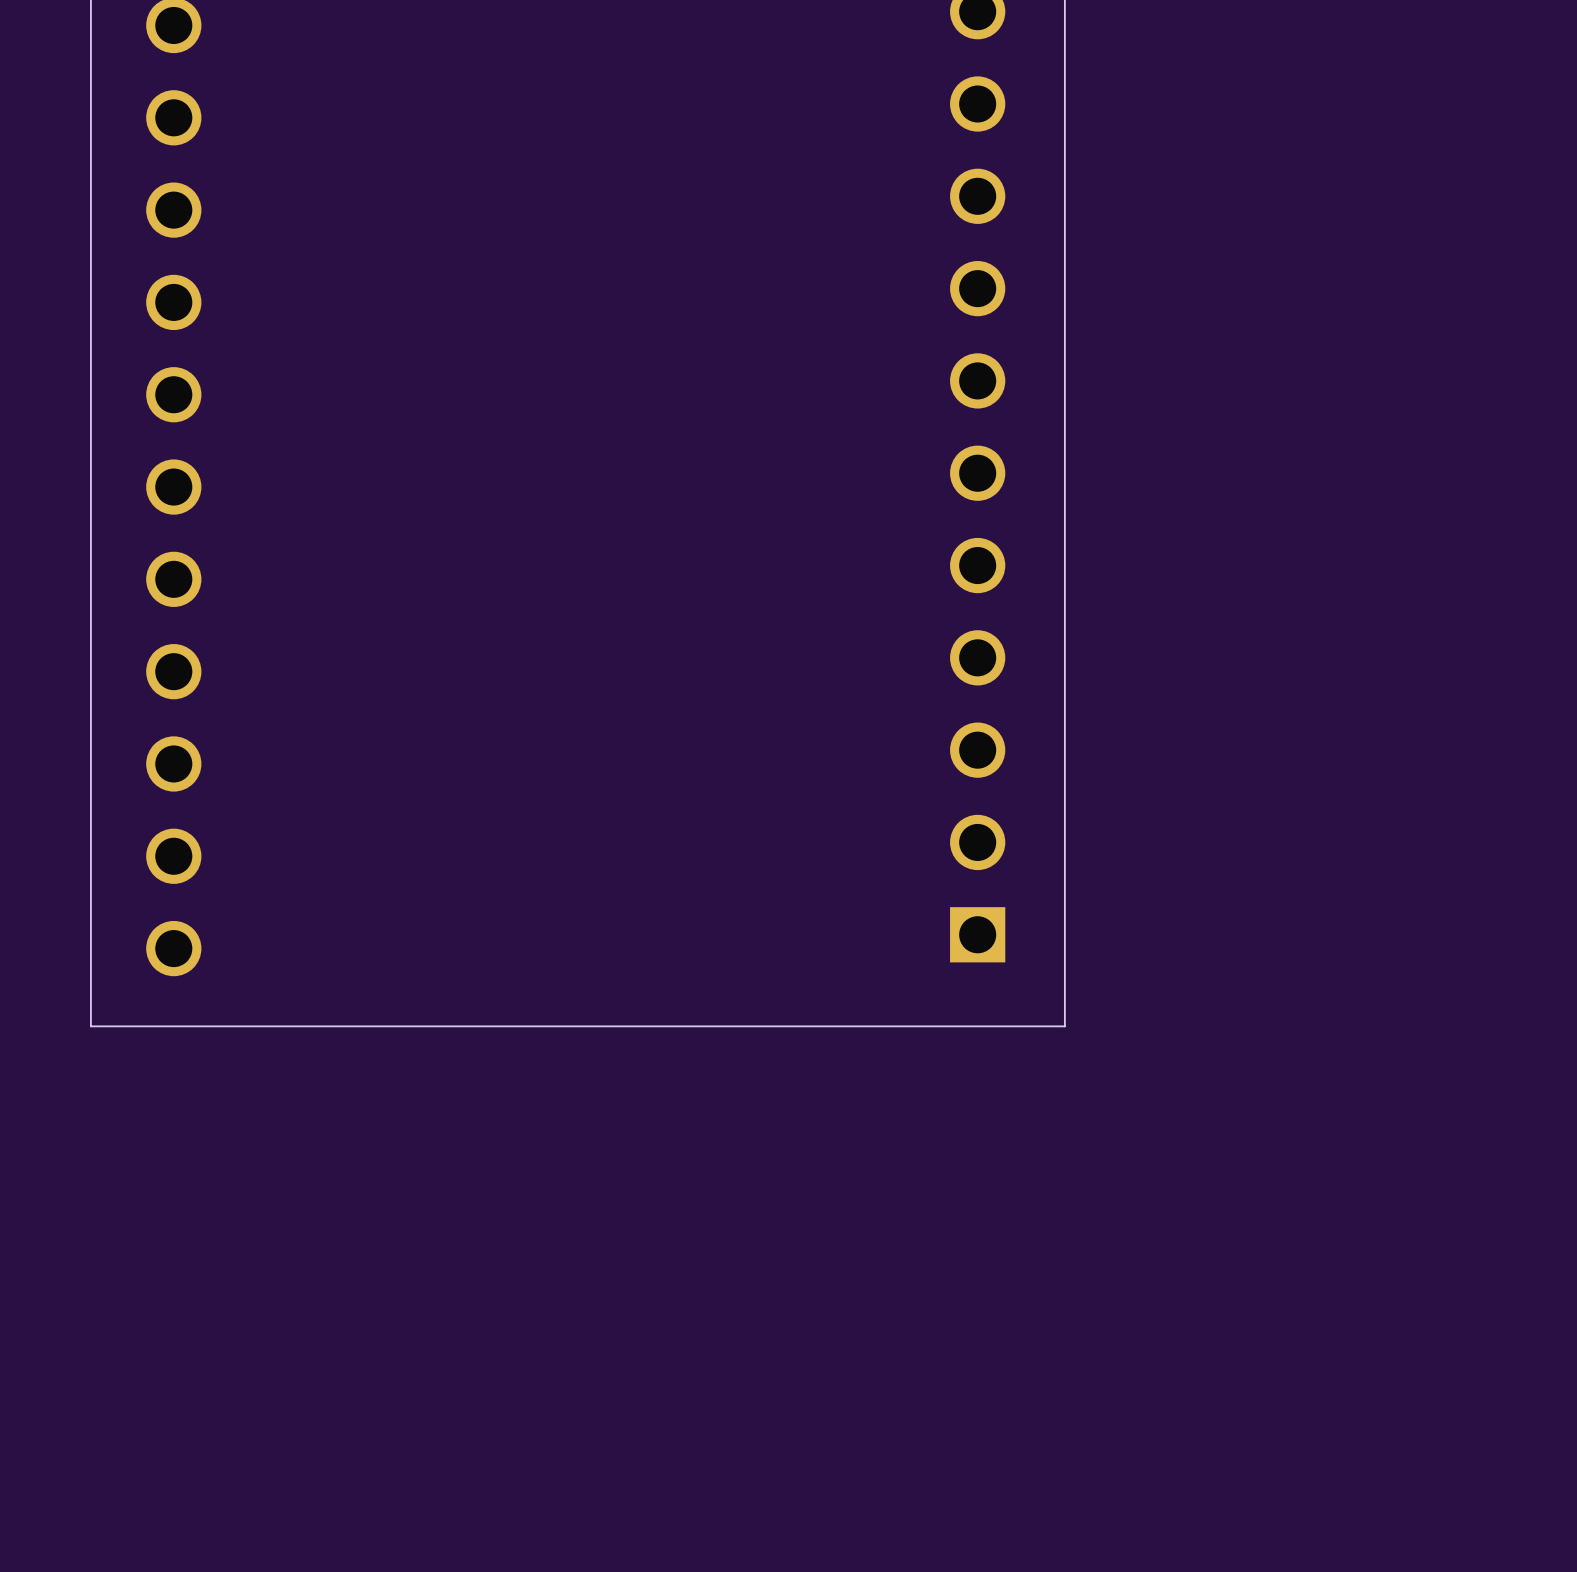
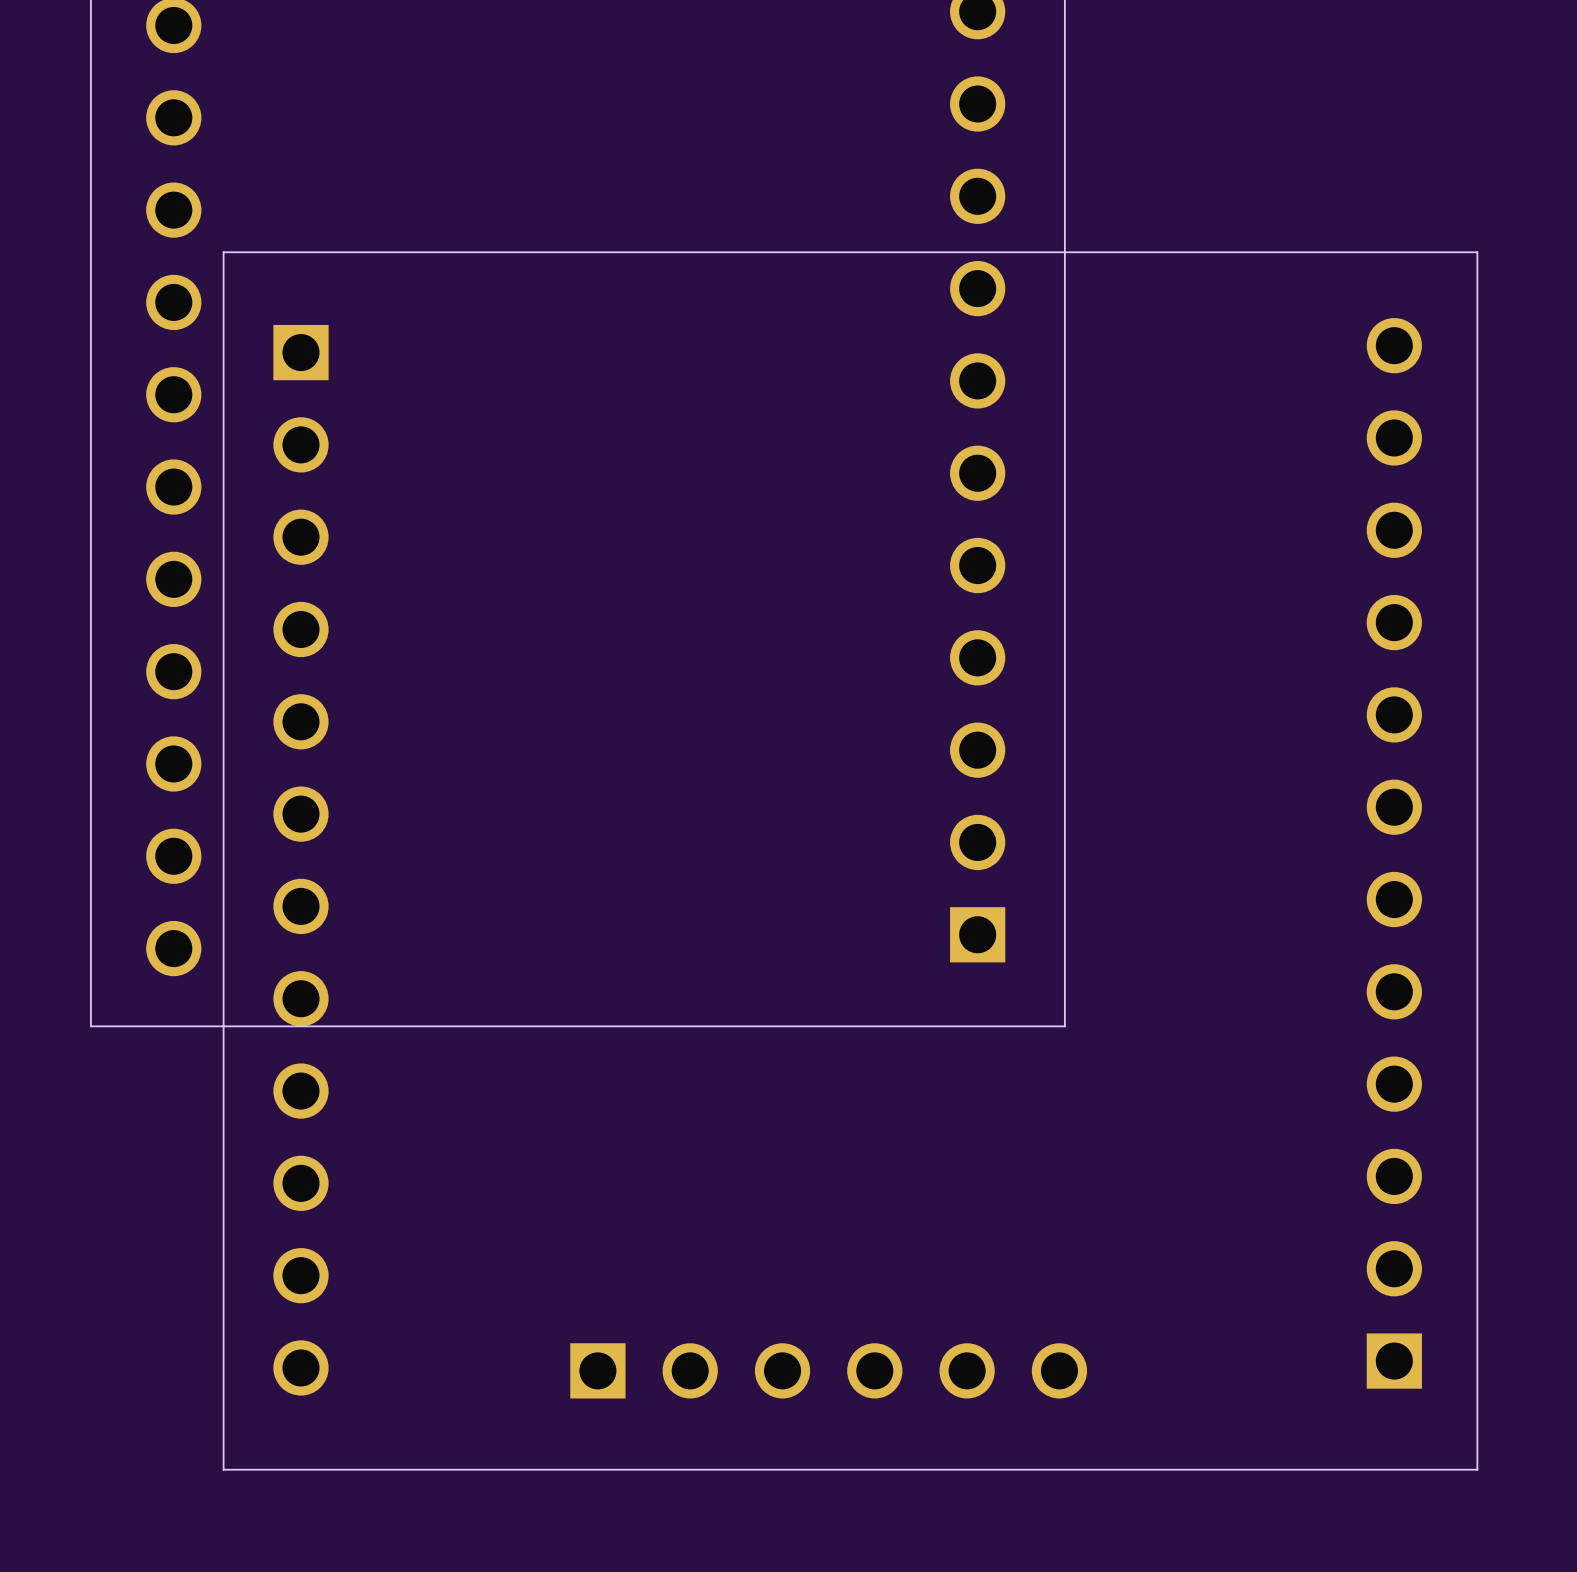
board edge: none -> (1477, 252) (1477, 1469) (223, 1469) (223, 252) (1477, 252)
part: none -> (1394, 853)
part: none -> (300, 860)
part: none -> (828, 1370)

